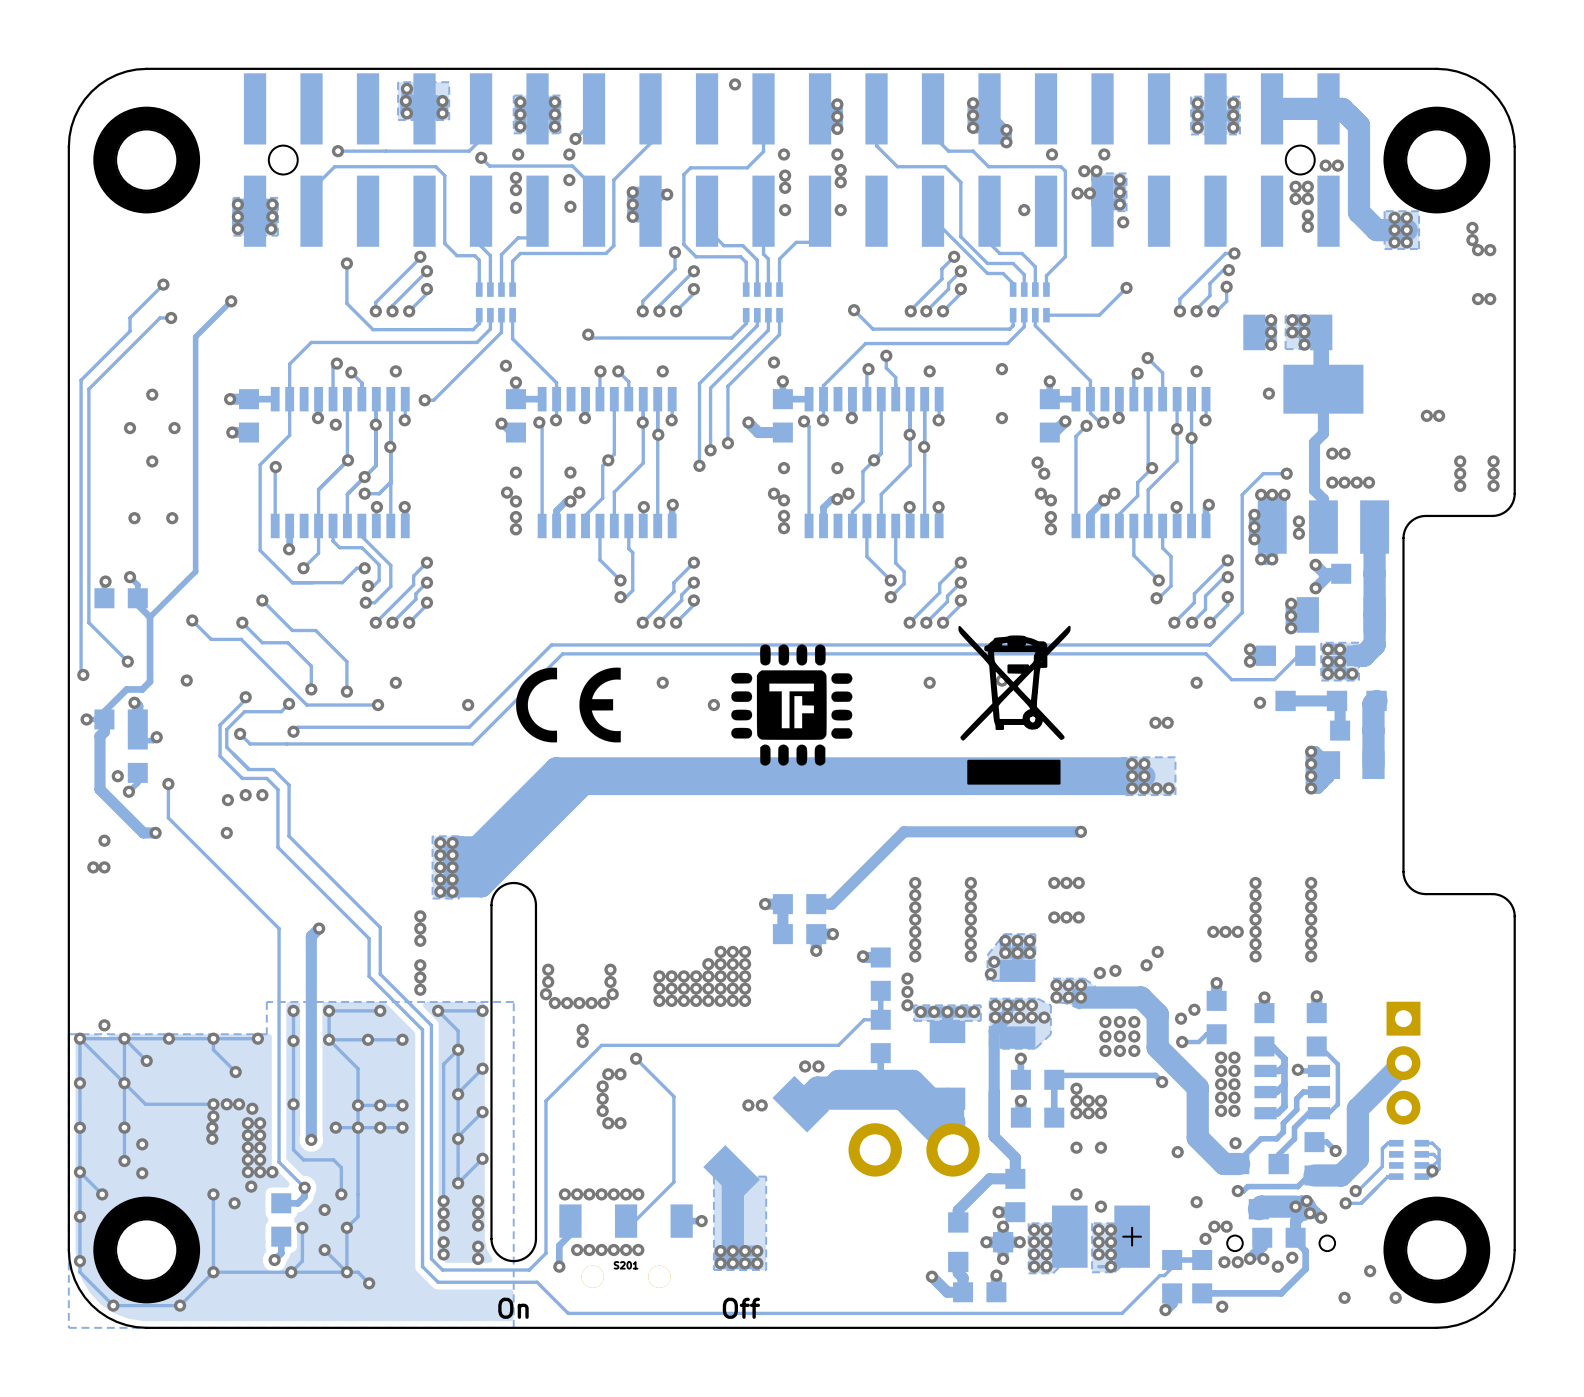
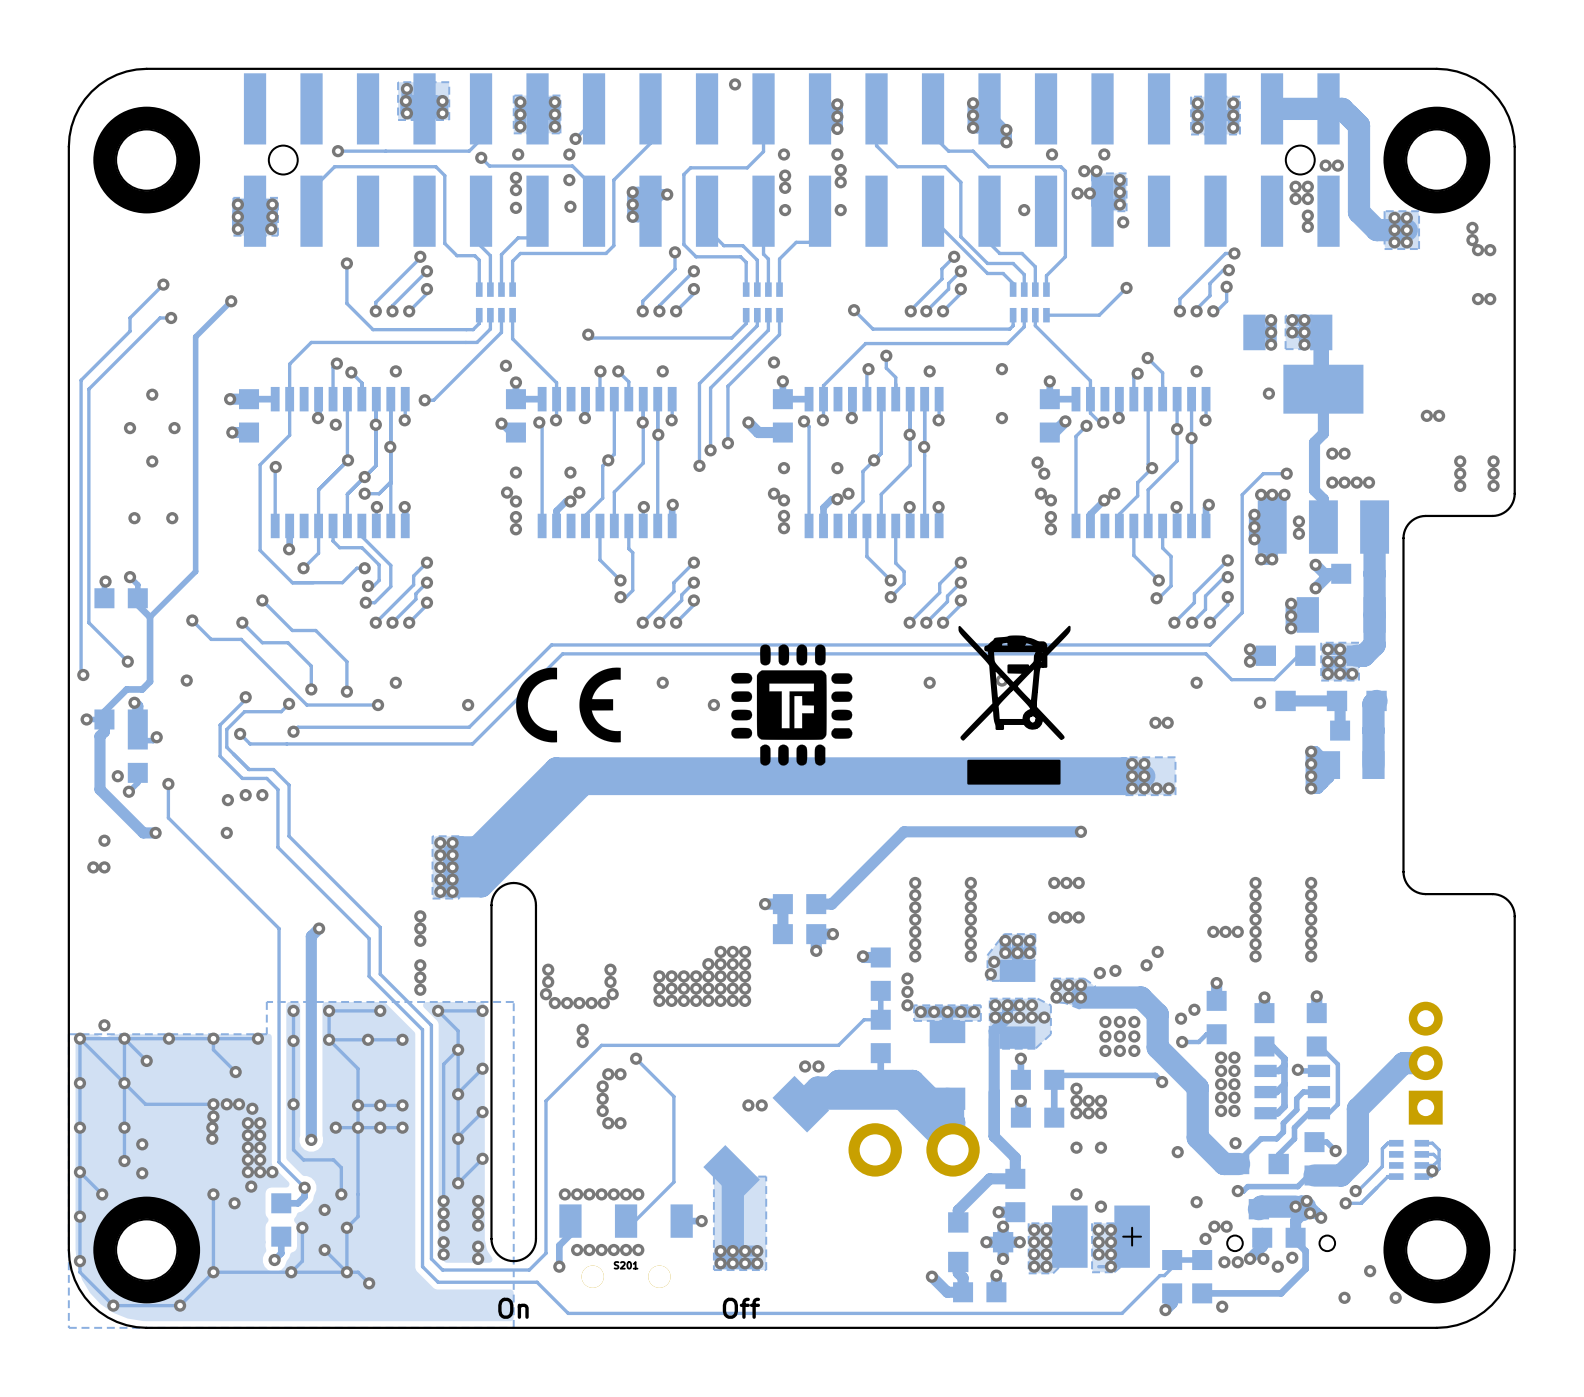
part rotation: 0° (1403, 1063) -> 180° (1425, 1063)

